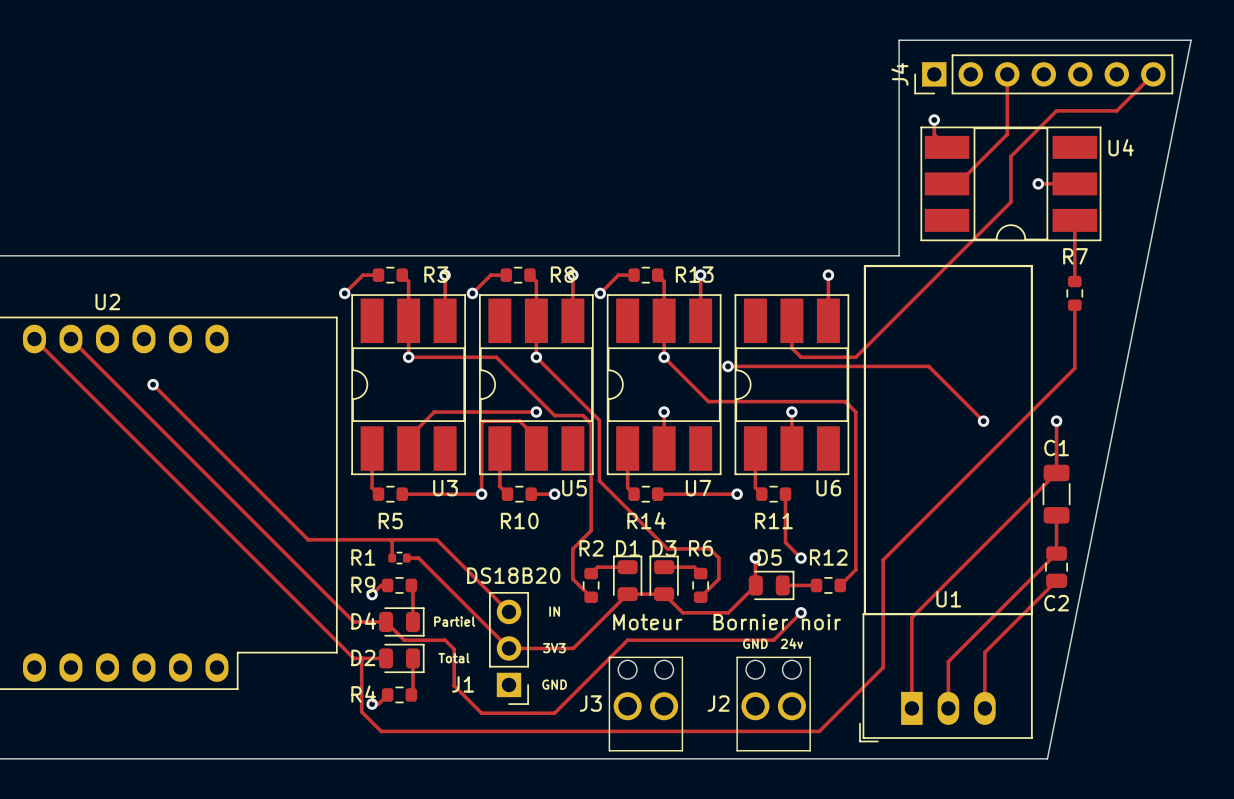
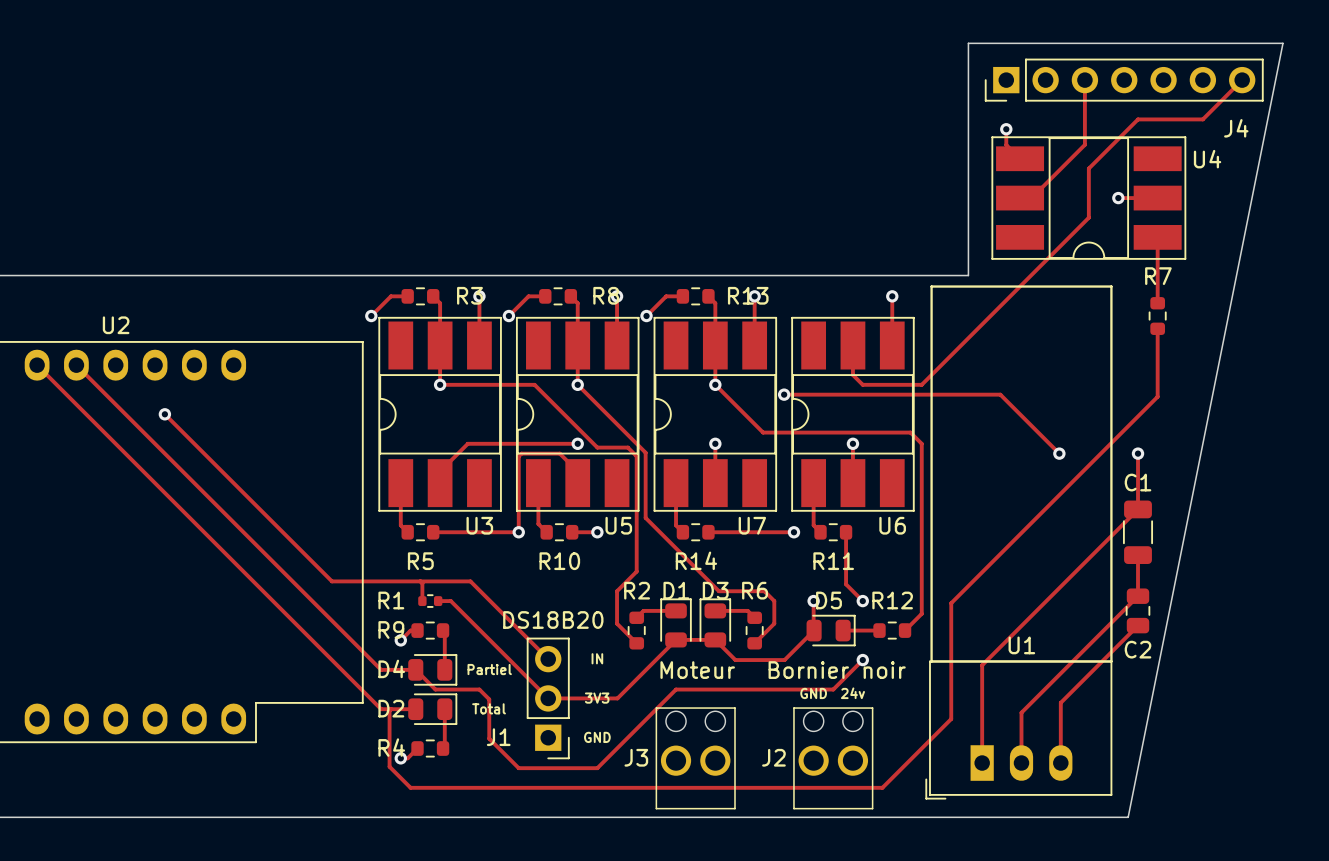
J4 name rotation: 0° (899, 74) -> 90° clockwise (1236, 128)
J4 name position: J4 (899, 74) -> J4 (1236, 128)

